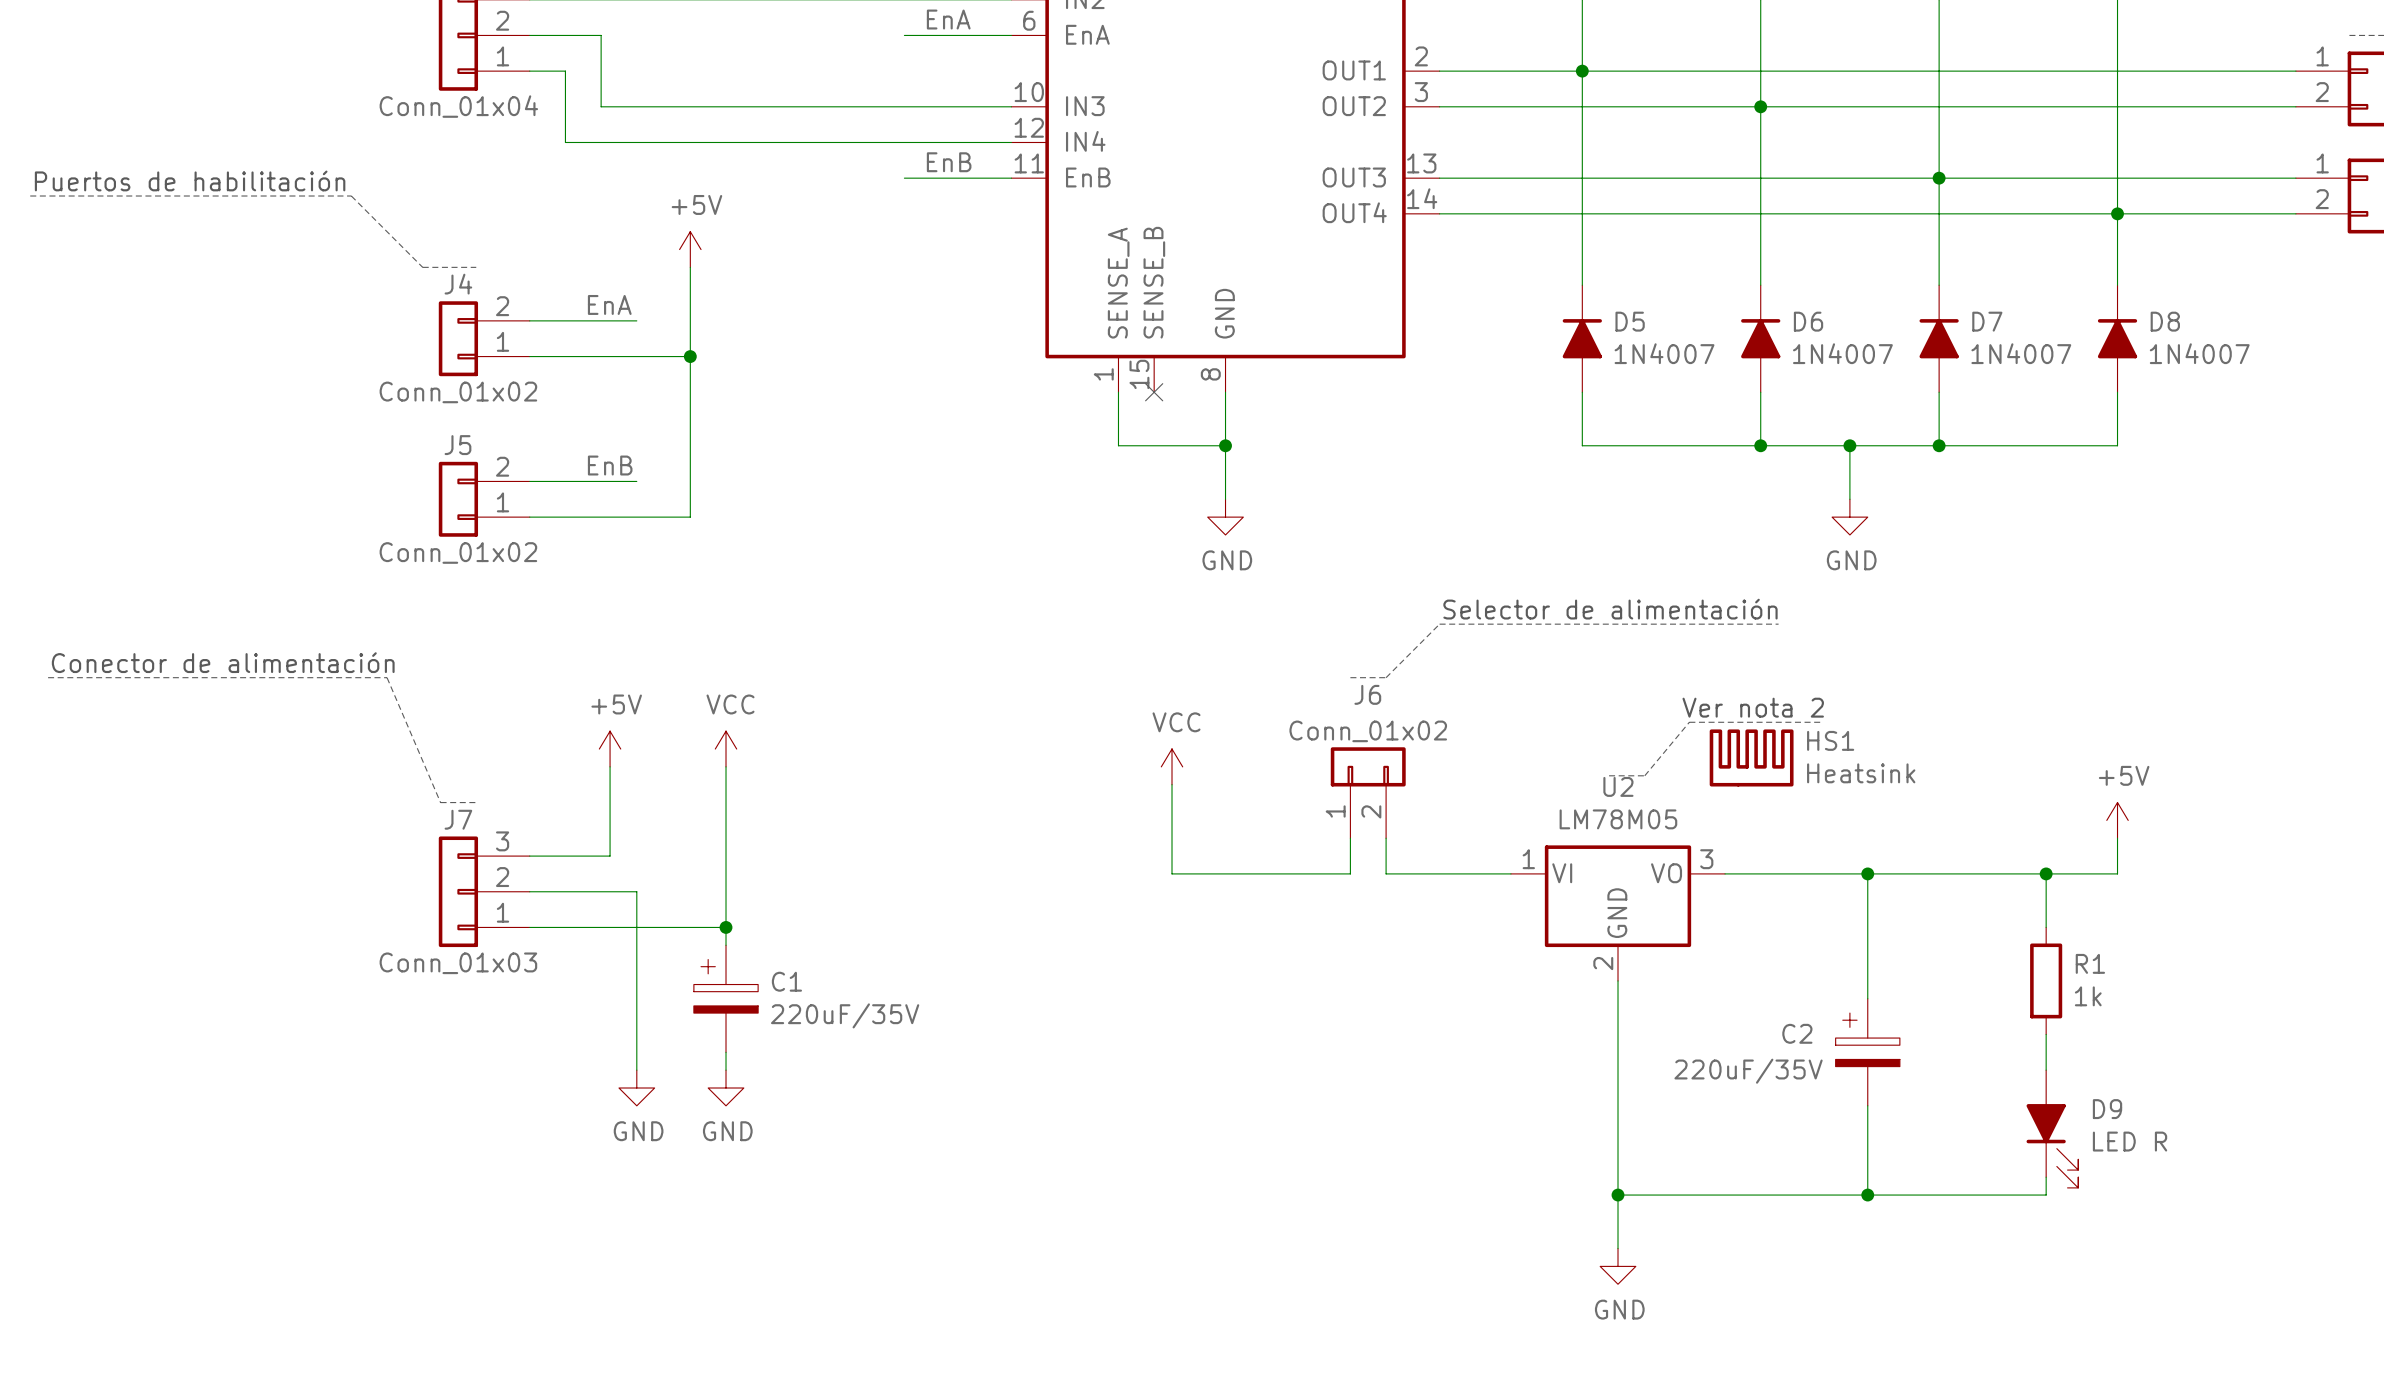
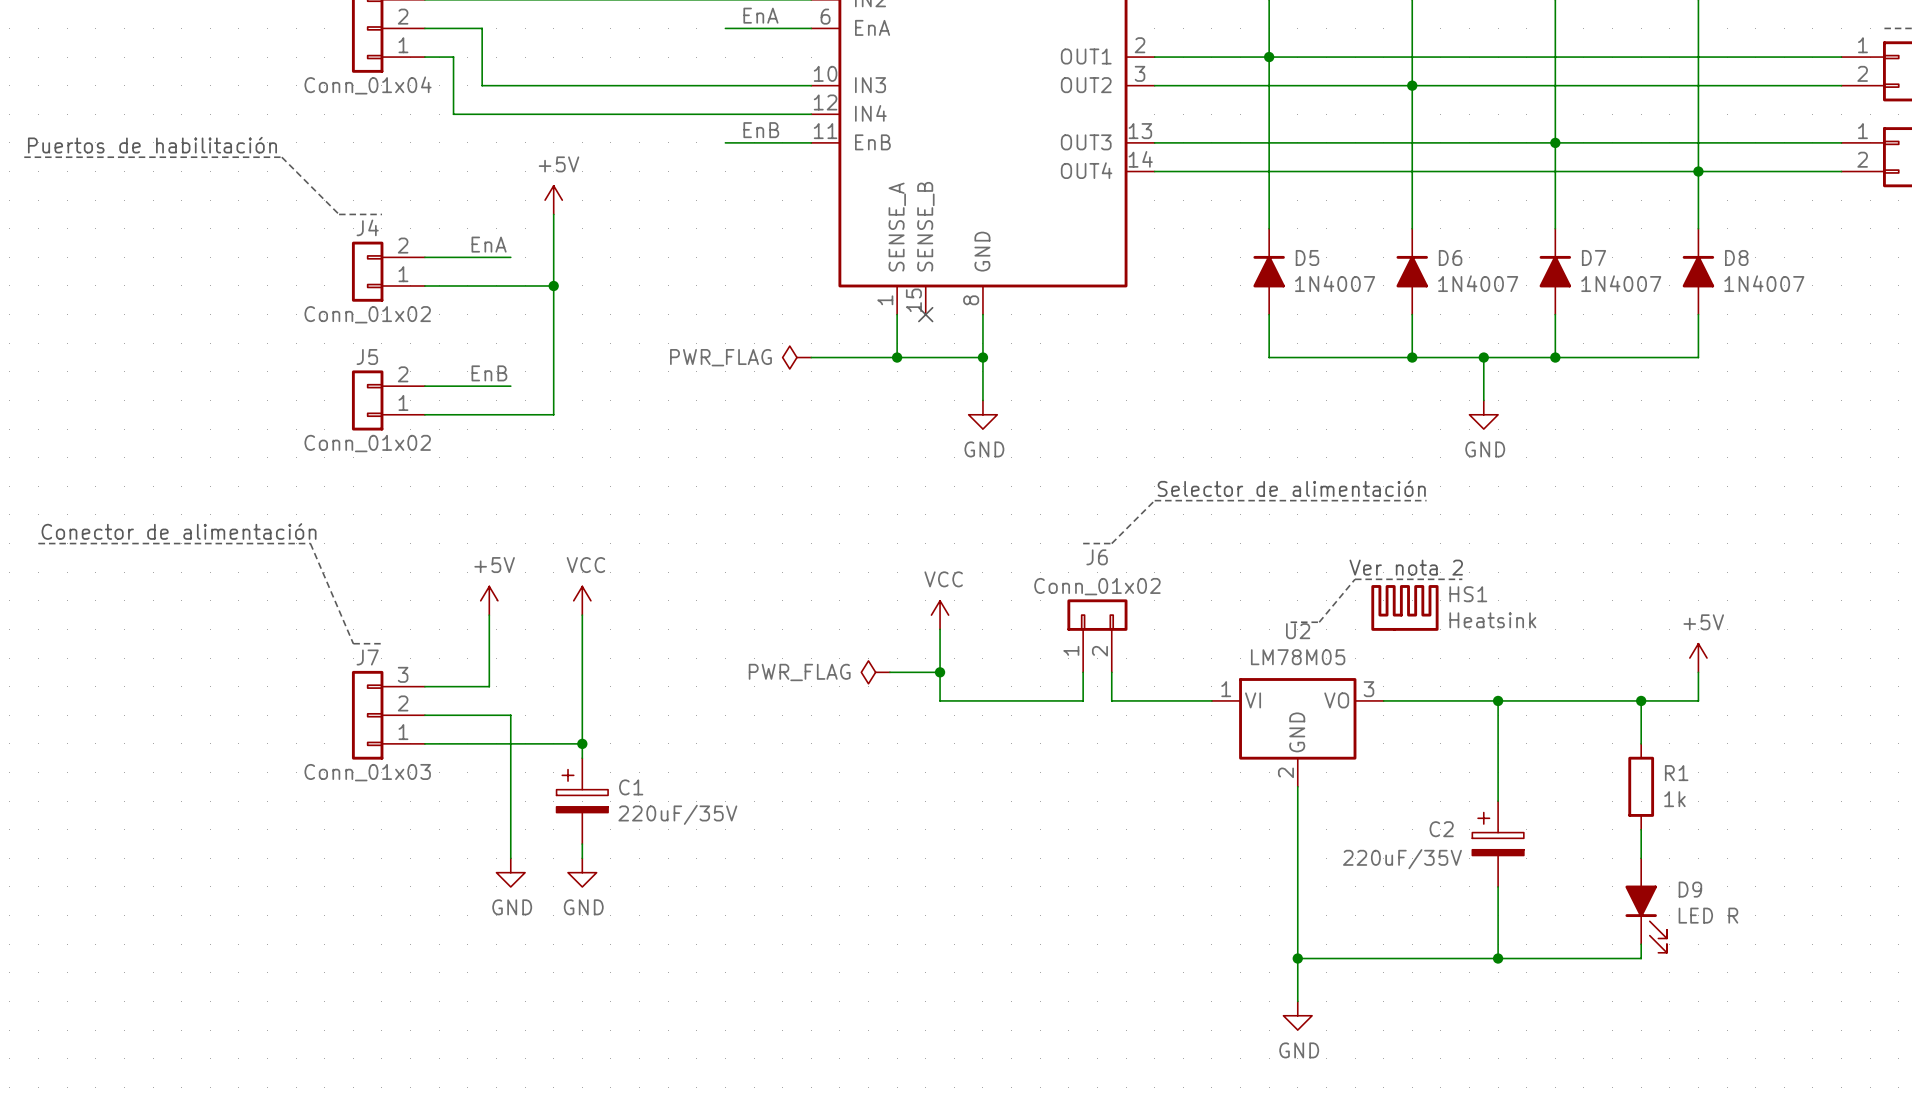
power symbol: none -> PWR_FLAG (796, 357)
wire: none -> (811, 357) (897, 357)
junction: none -> (897, 357)
power symbol: none -> PWR_FLAG (875, 672)
wire: none -> (889, 672) (940, 672)
junction: none -> (940, 672)

